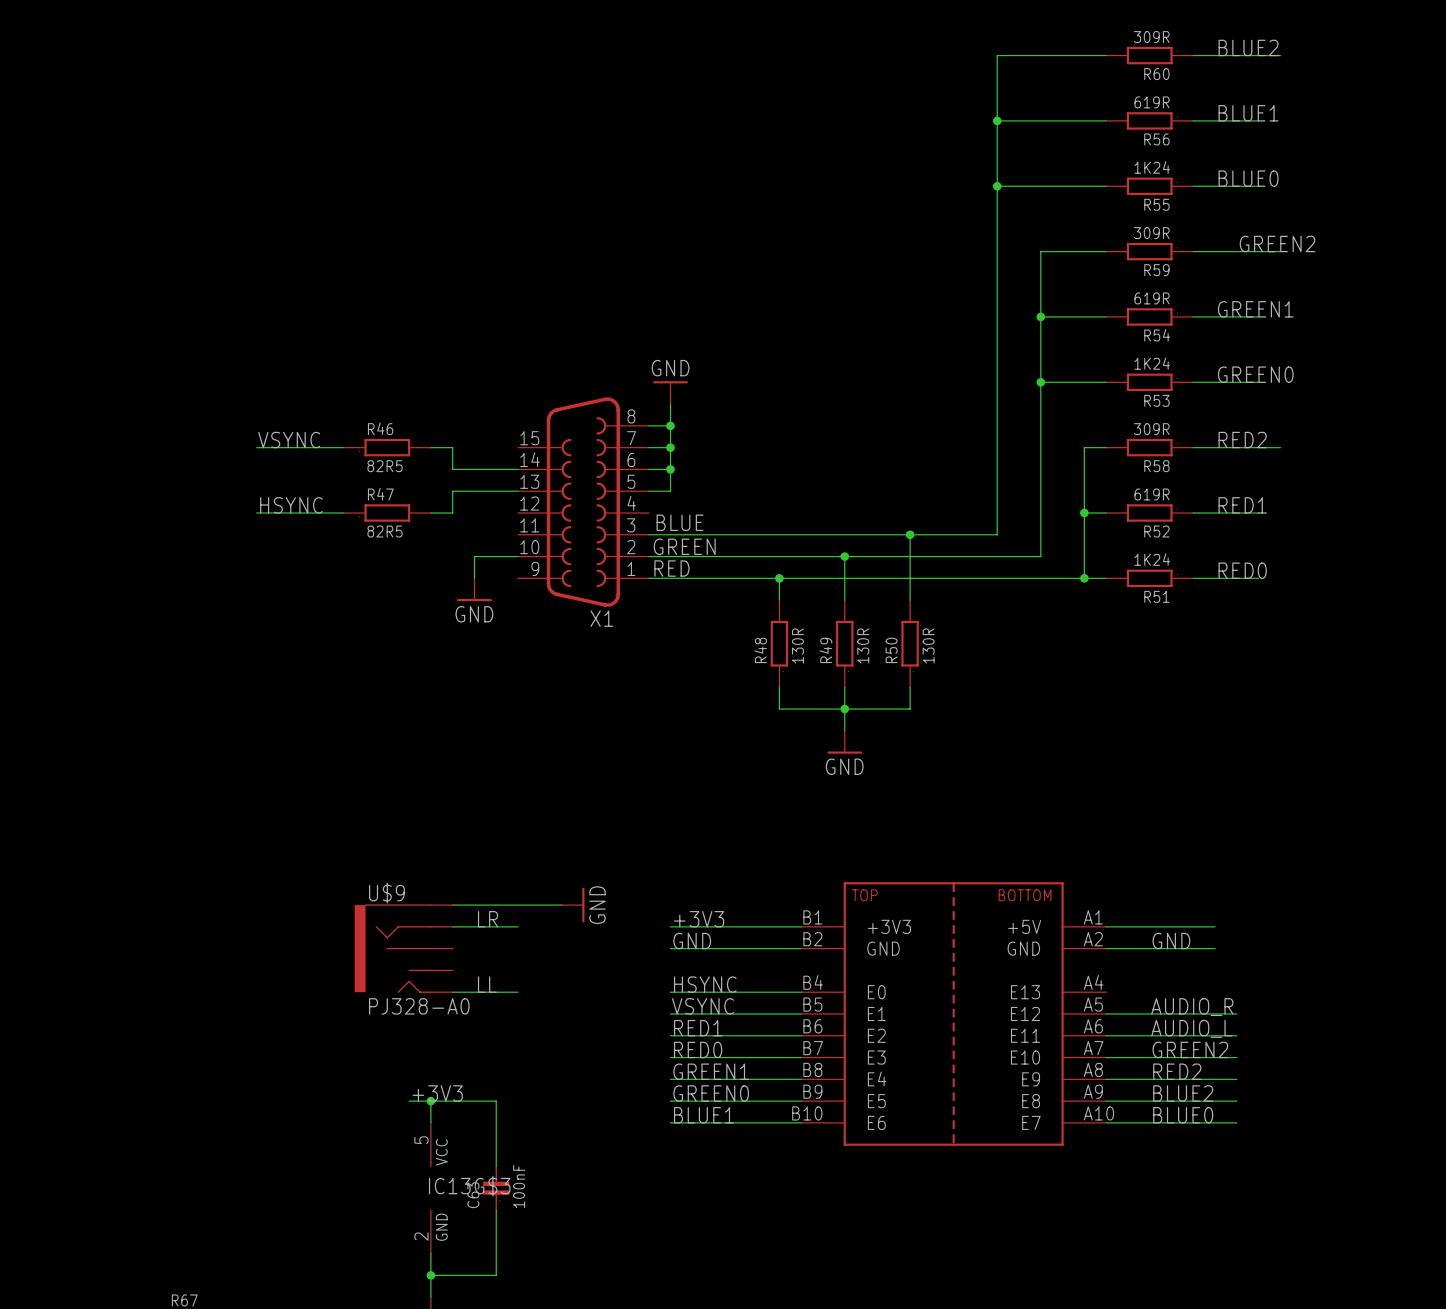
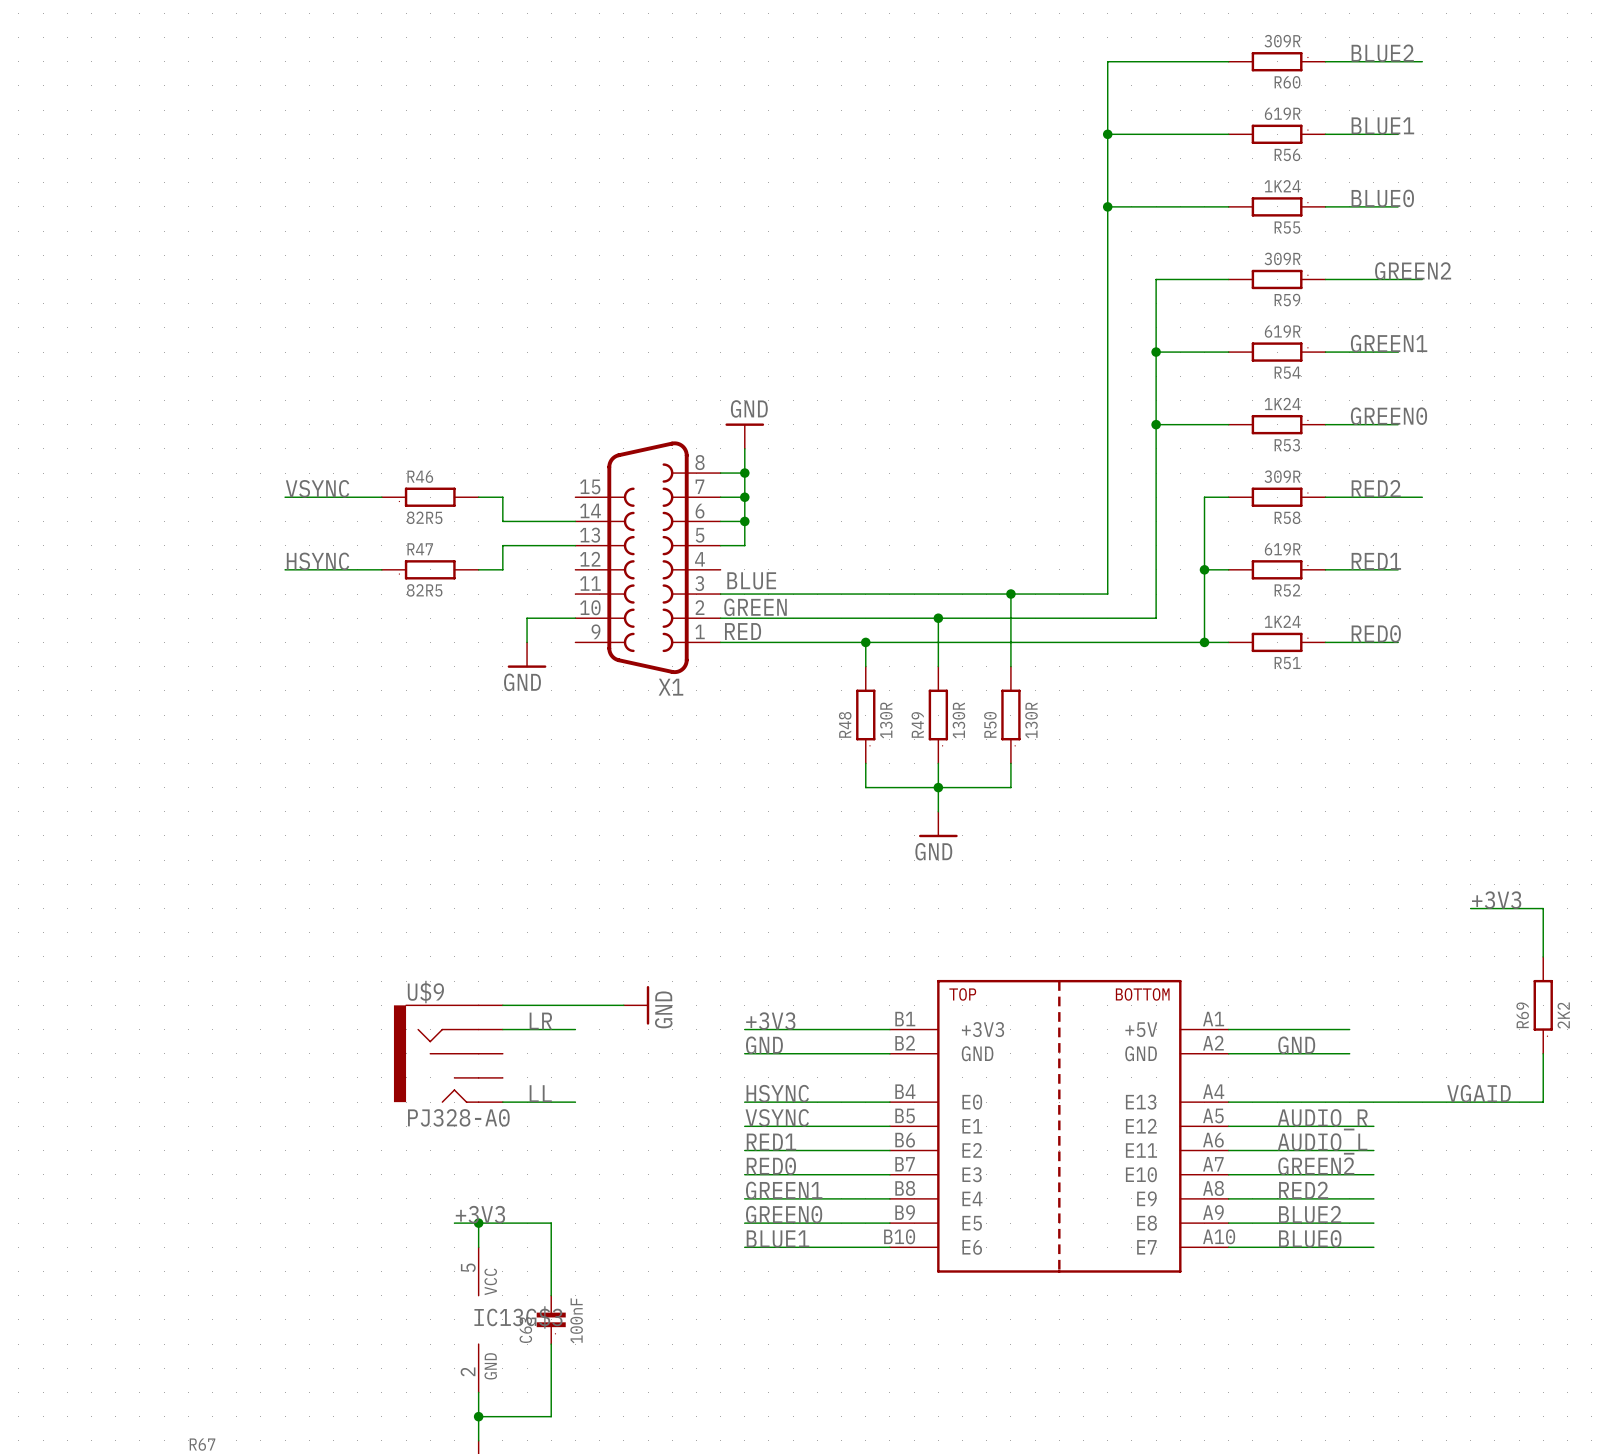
label: none -> +3V3 (1496, 900)
wire: none -> (1470, 908) (1543, 908) (1543, 956)
R69: none -> 2K2 (1543, 1005)
wire: none -> (1543, 1053) (1543, 1102) (1228, 1102)
label: none -> VGAID (1479, 1093)

